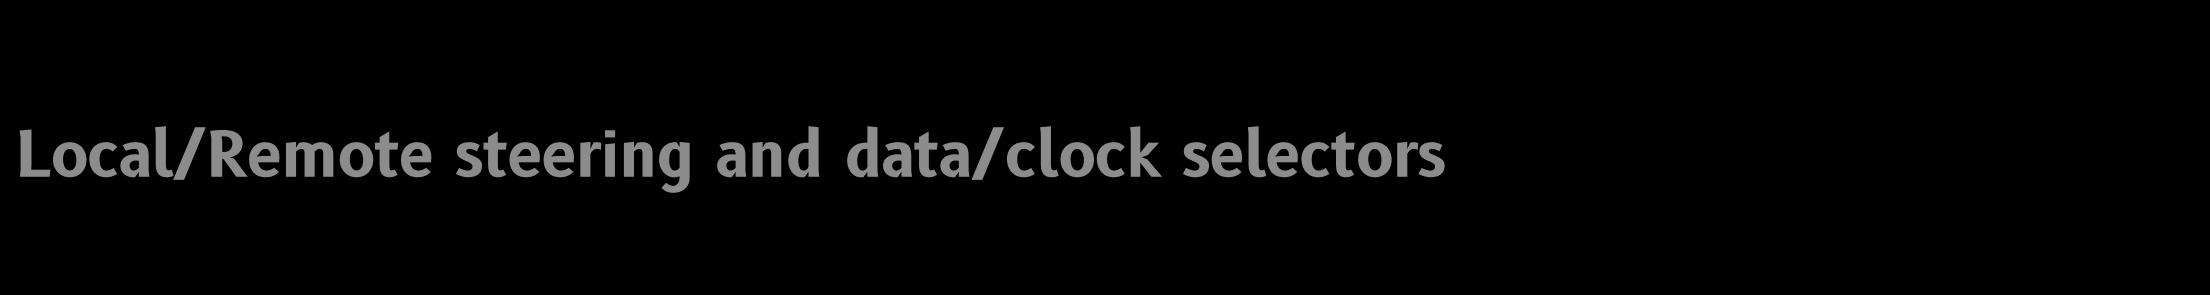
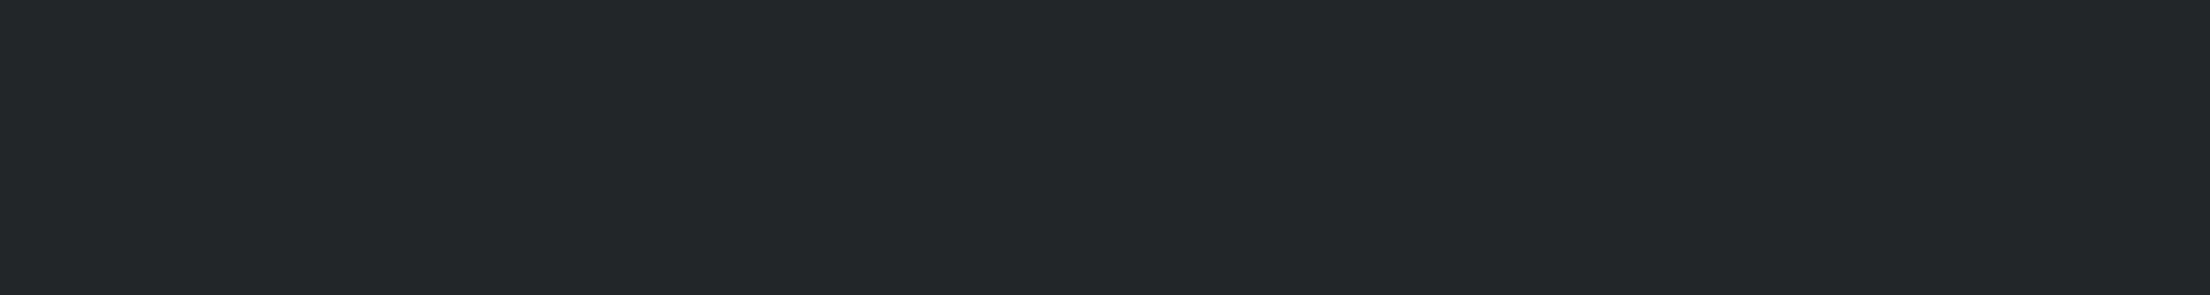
text: Local/Remote steering and data/clock selectors (732, 159) -> none

